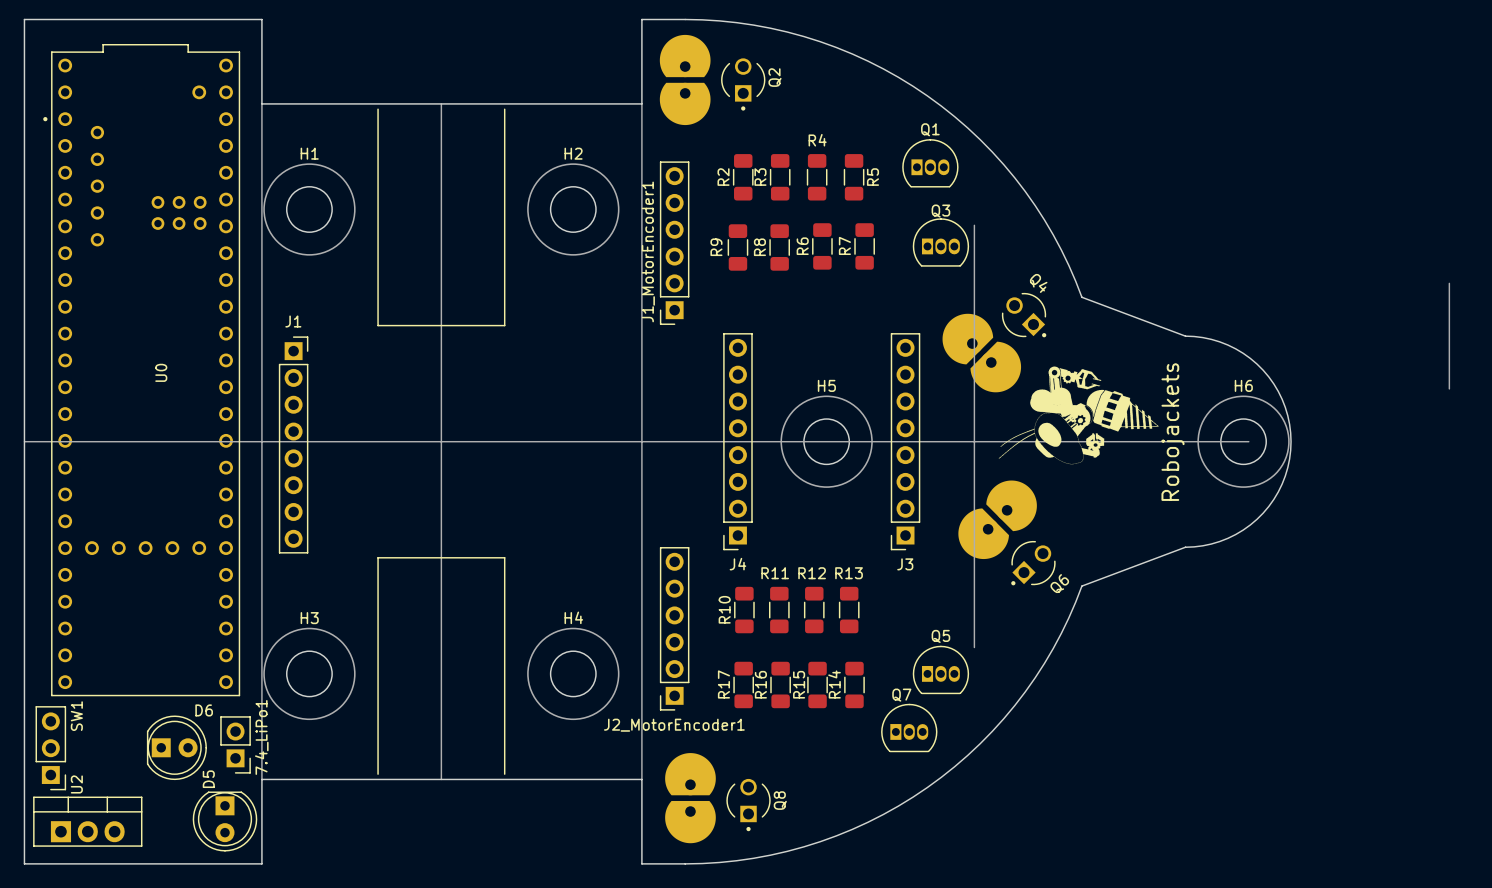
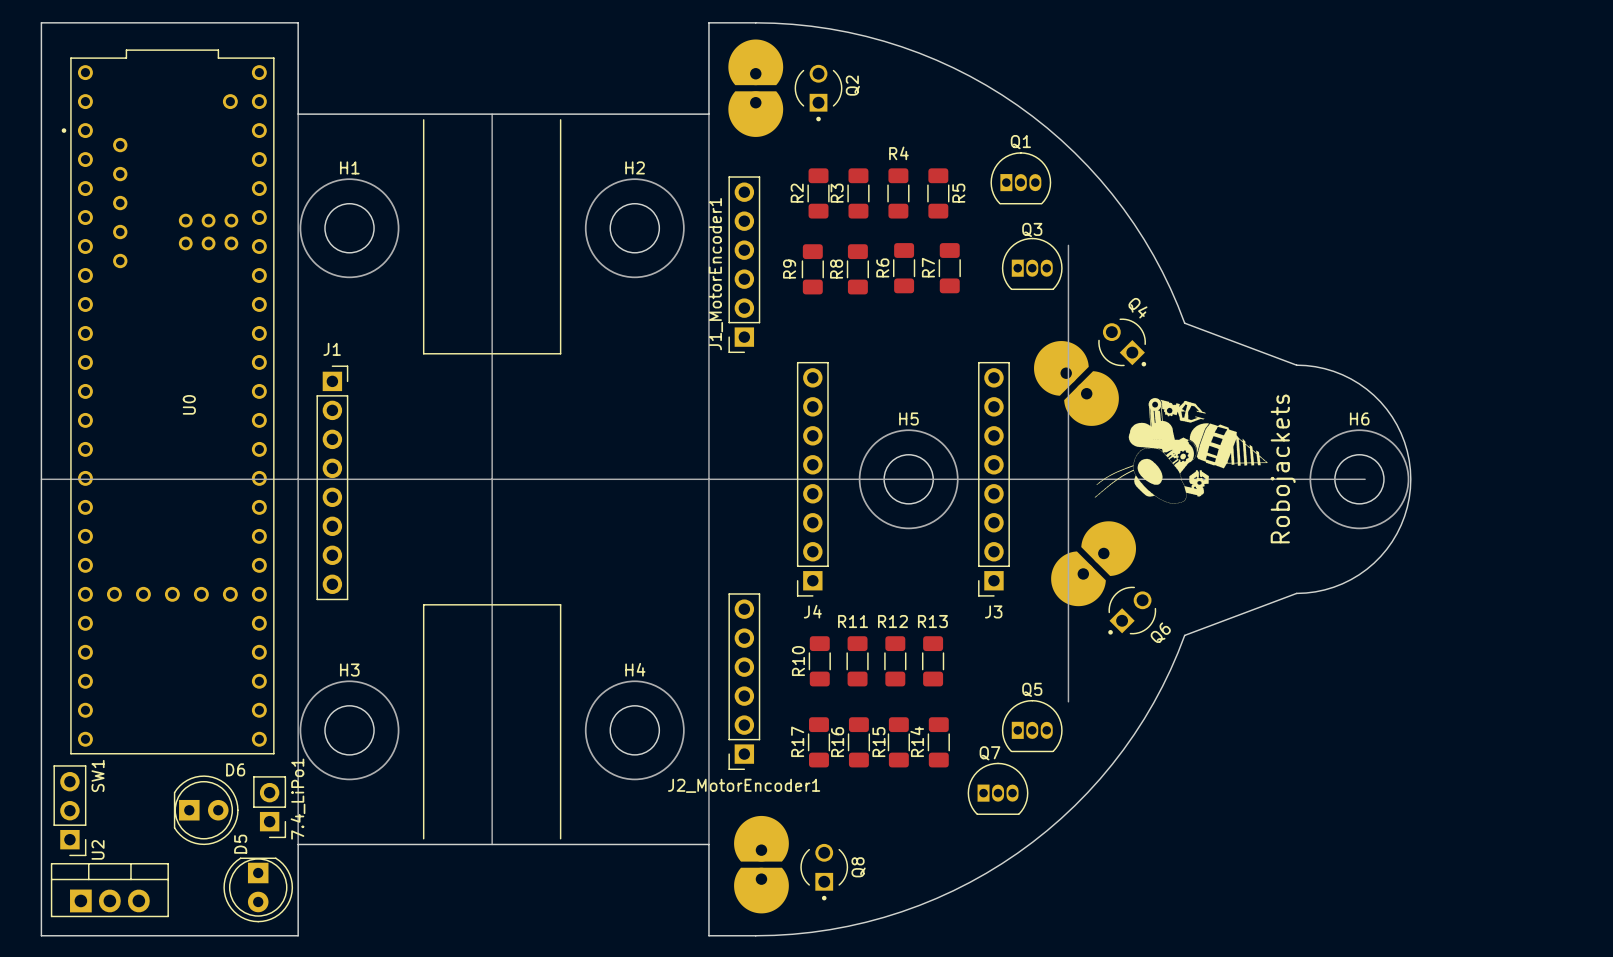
line: (1449, 283) (1449, 388) -> none

